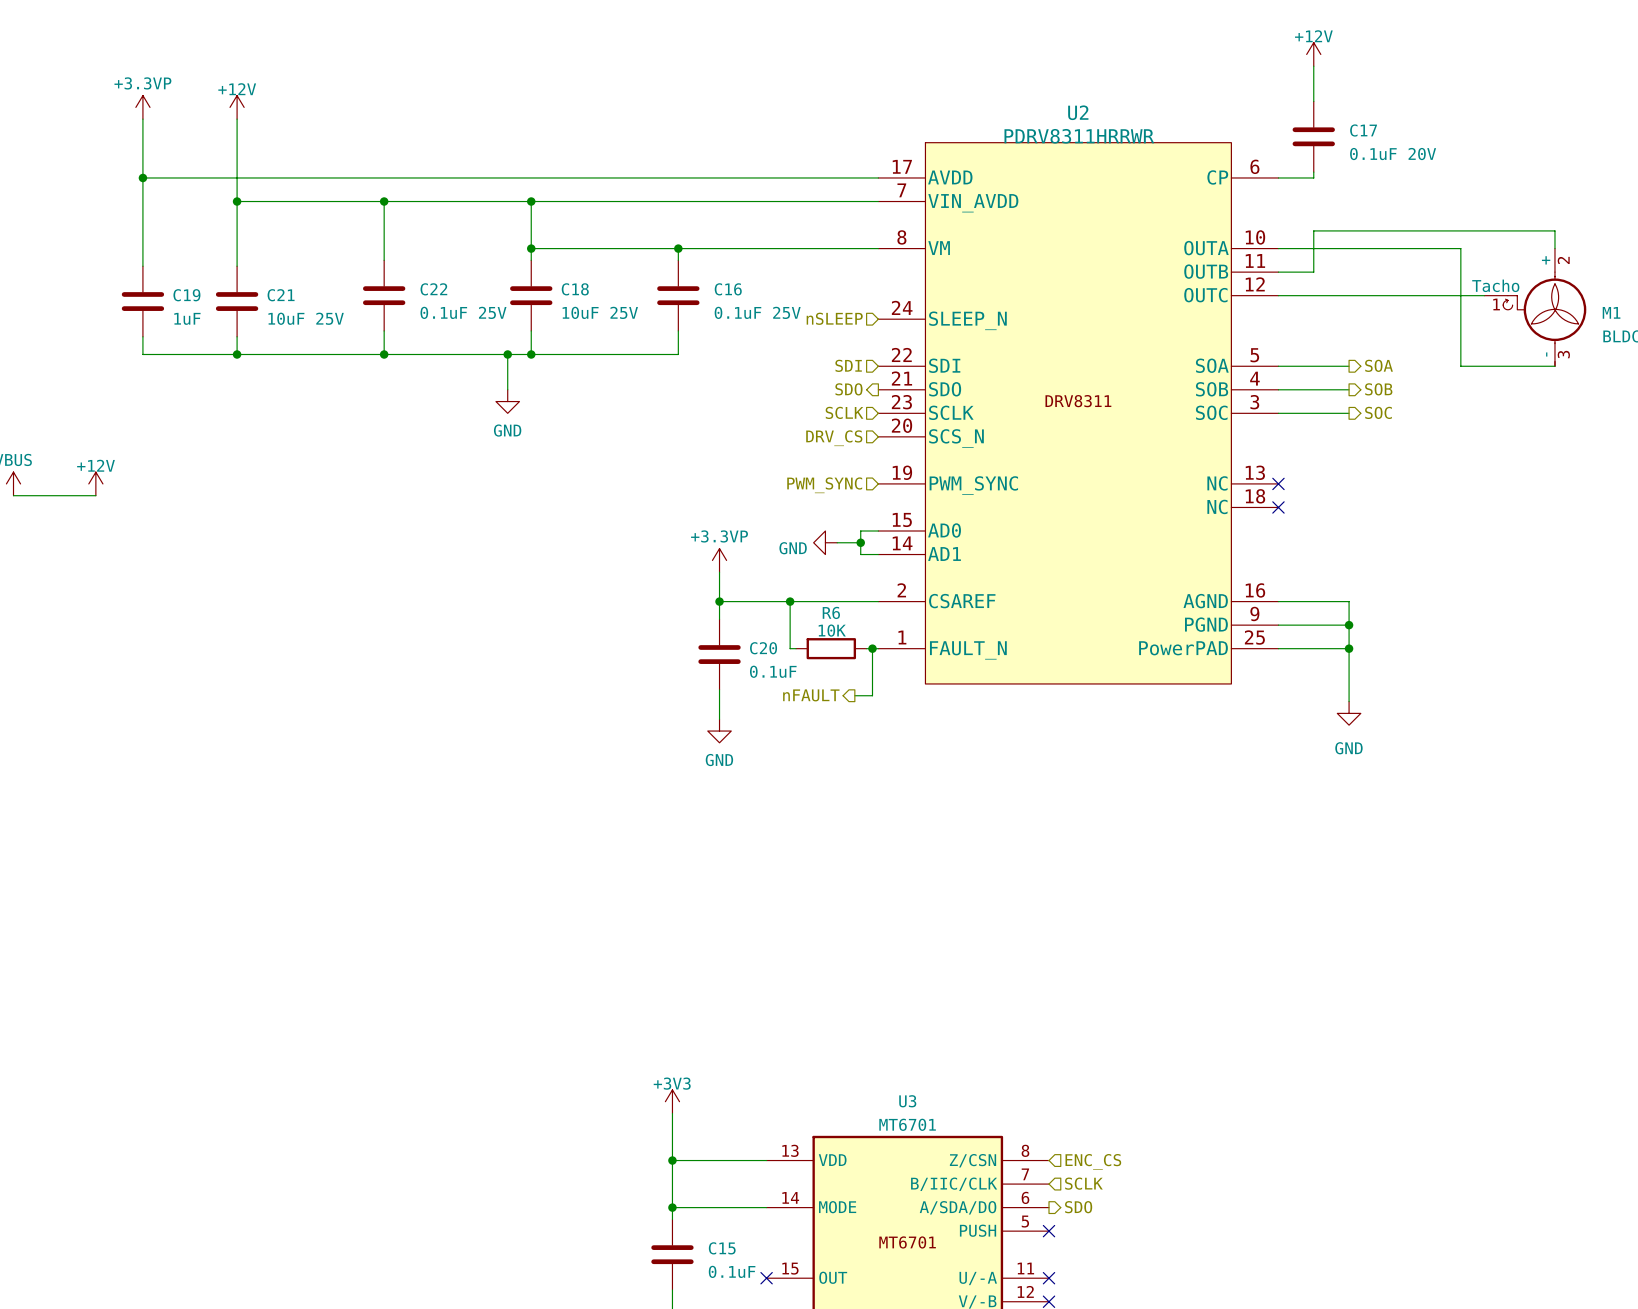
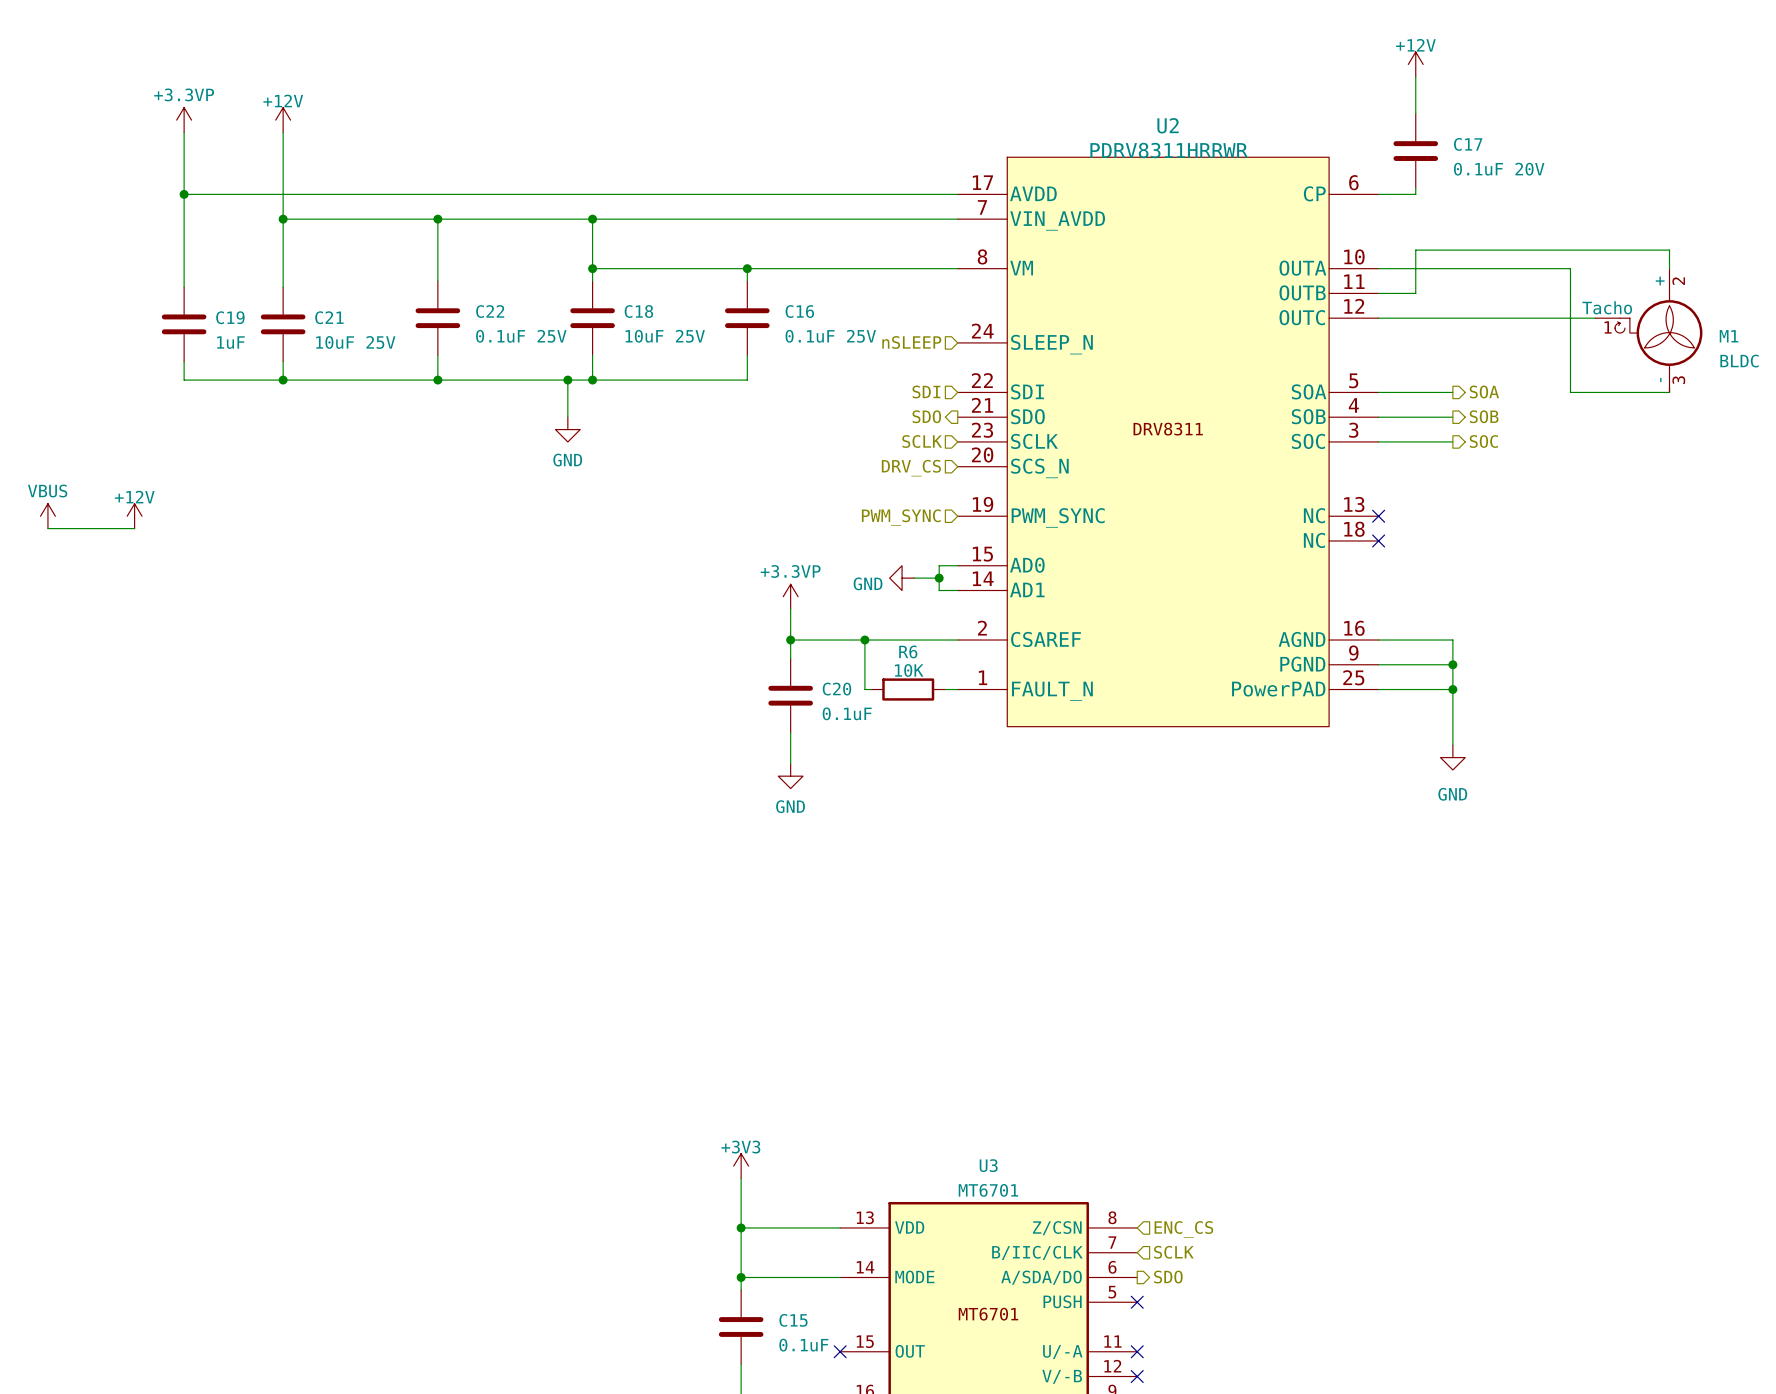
wire: (872, 648) (872, 695) (854, 695) -> none
junction: (872, 648) -> none
hierarchical label: nFAULT (811, 695) -> none

